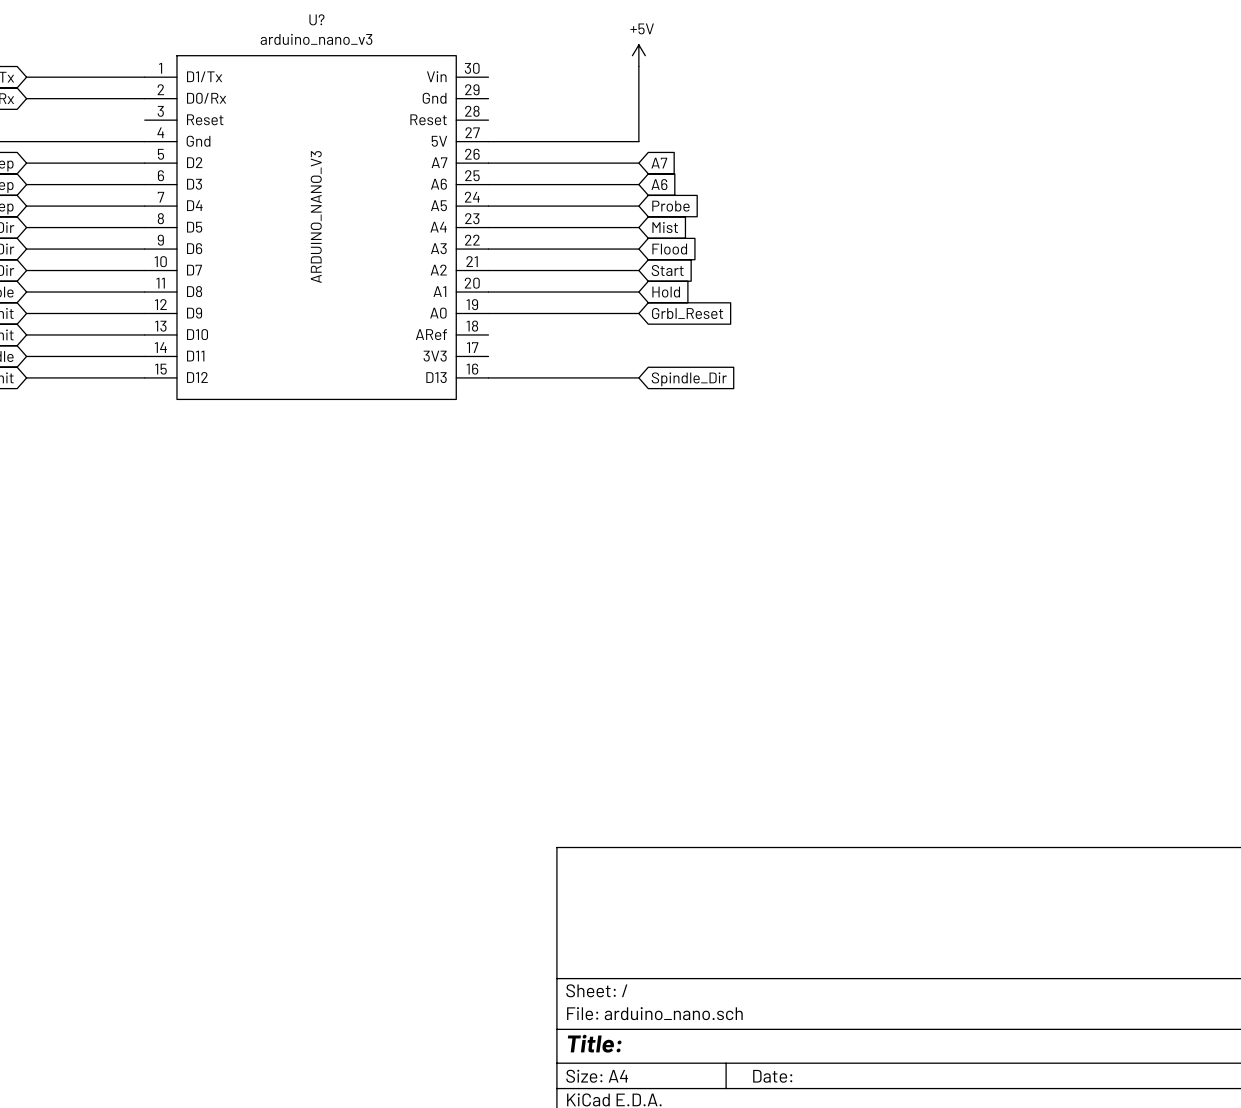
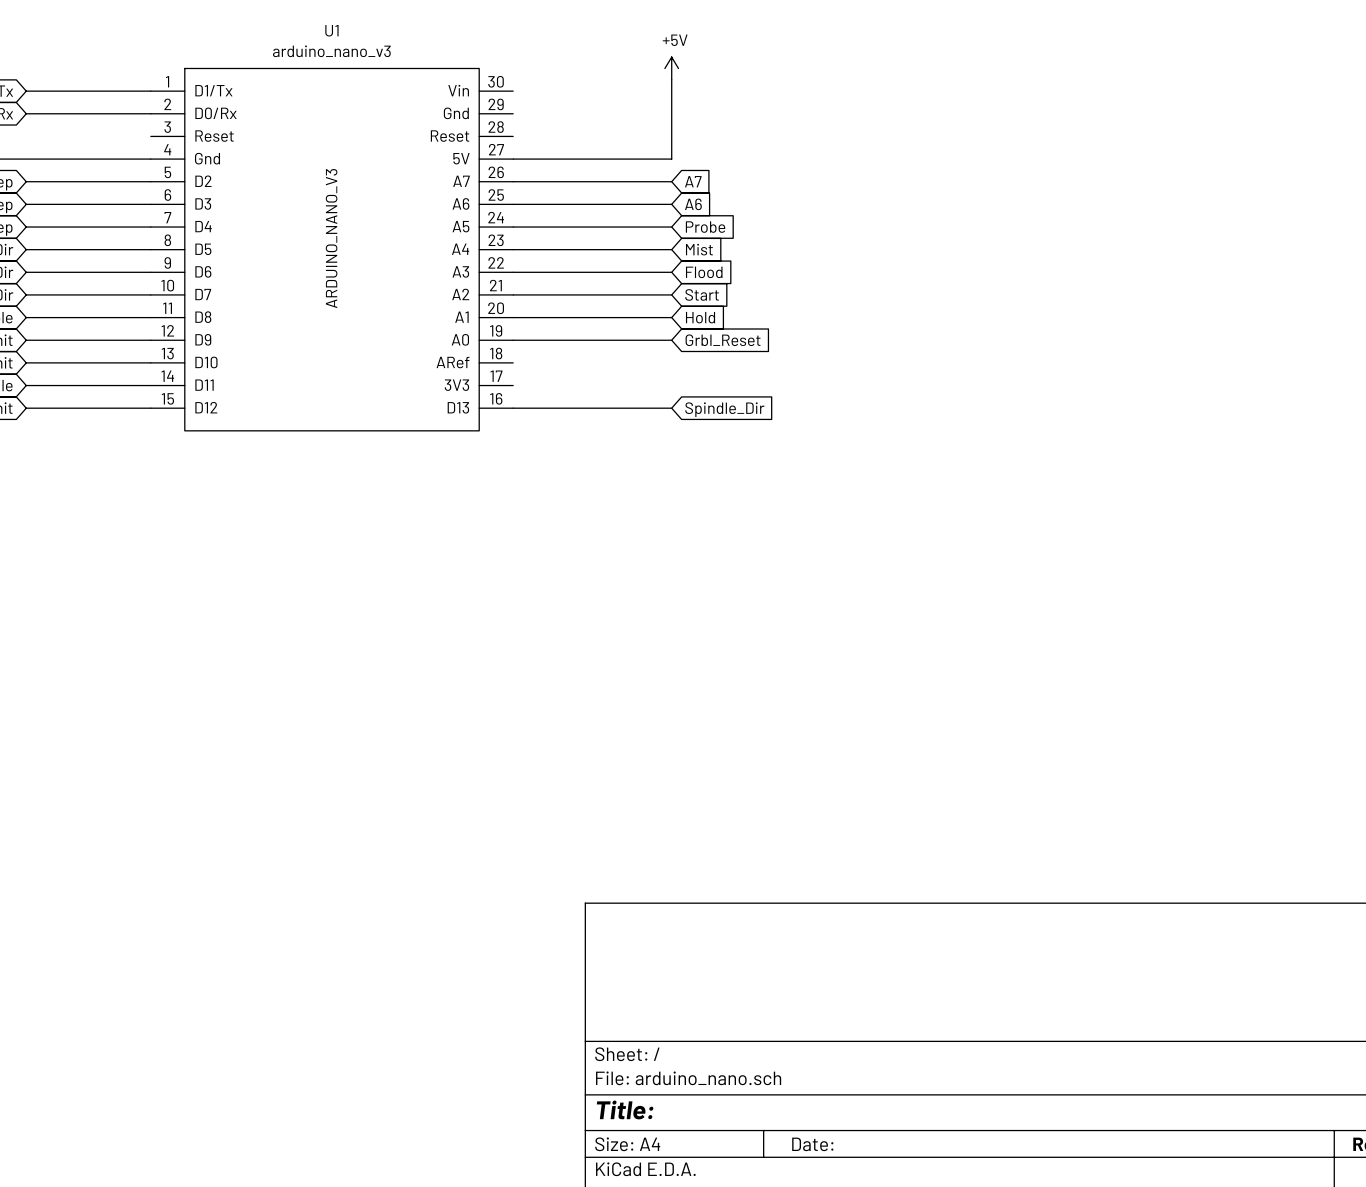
U? name: U? (316, 19) -> U1 (331, 30)

